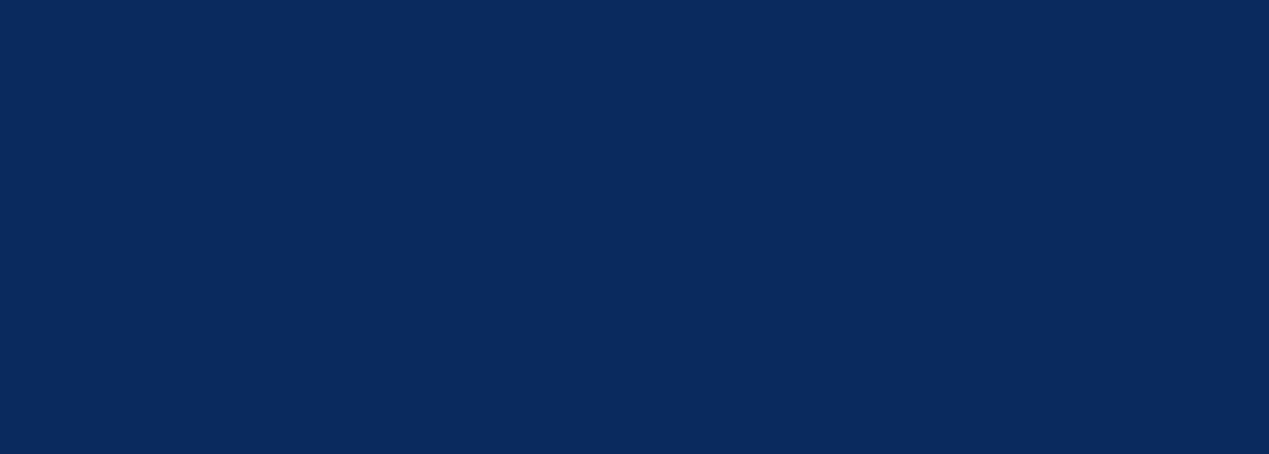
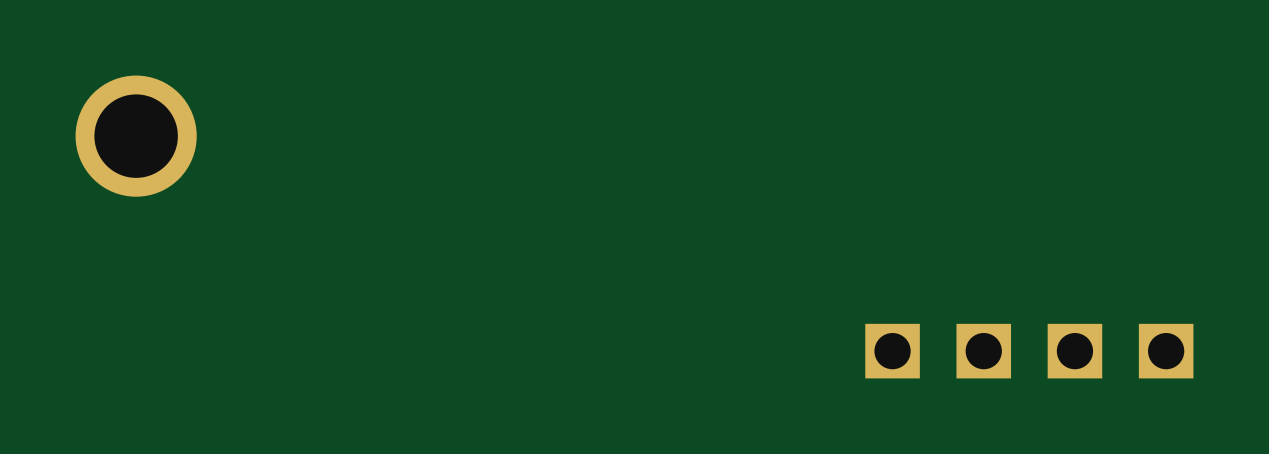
part: none -> (136, 136)
part: none -> (1029, 351)

